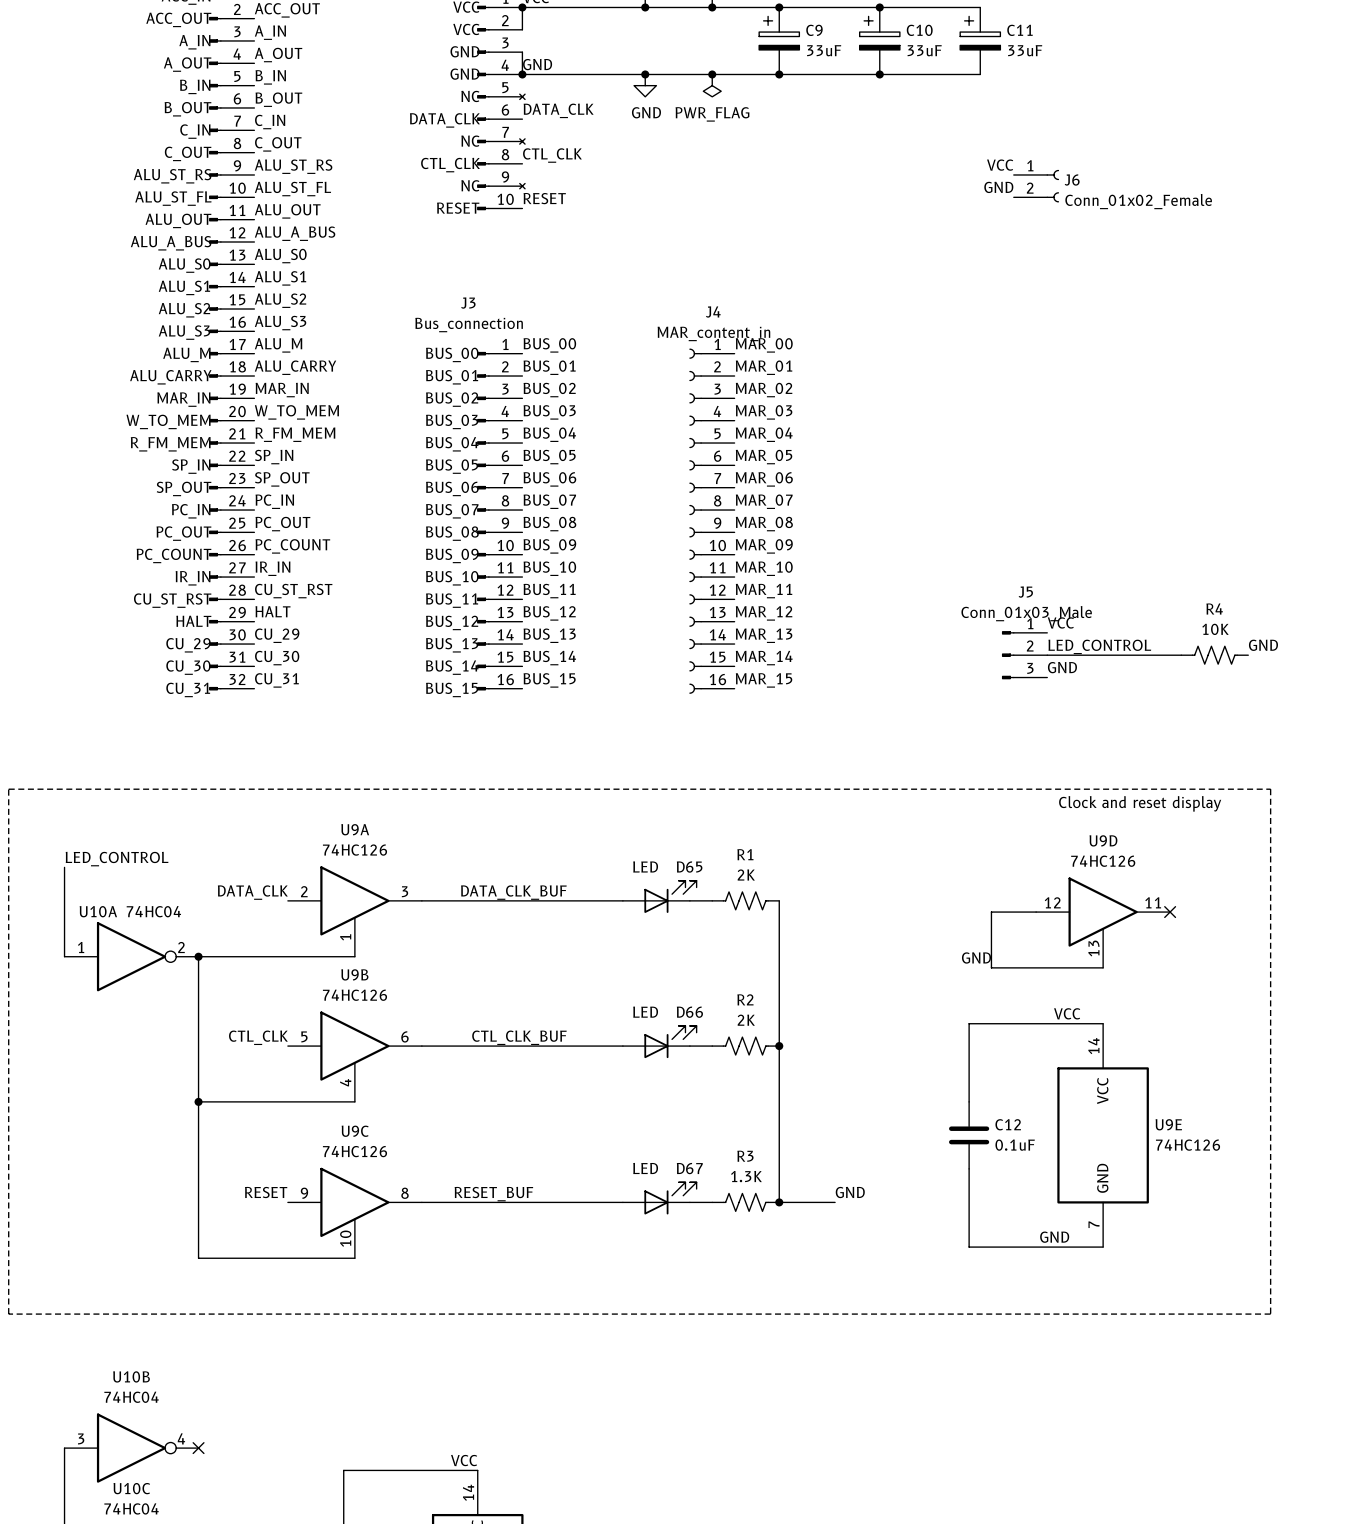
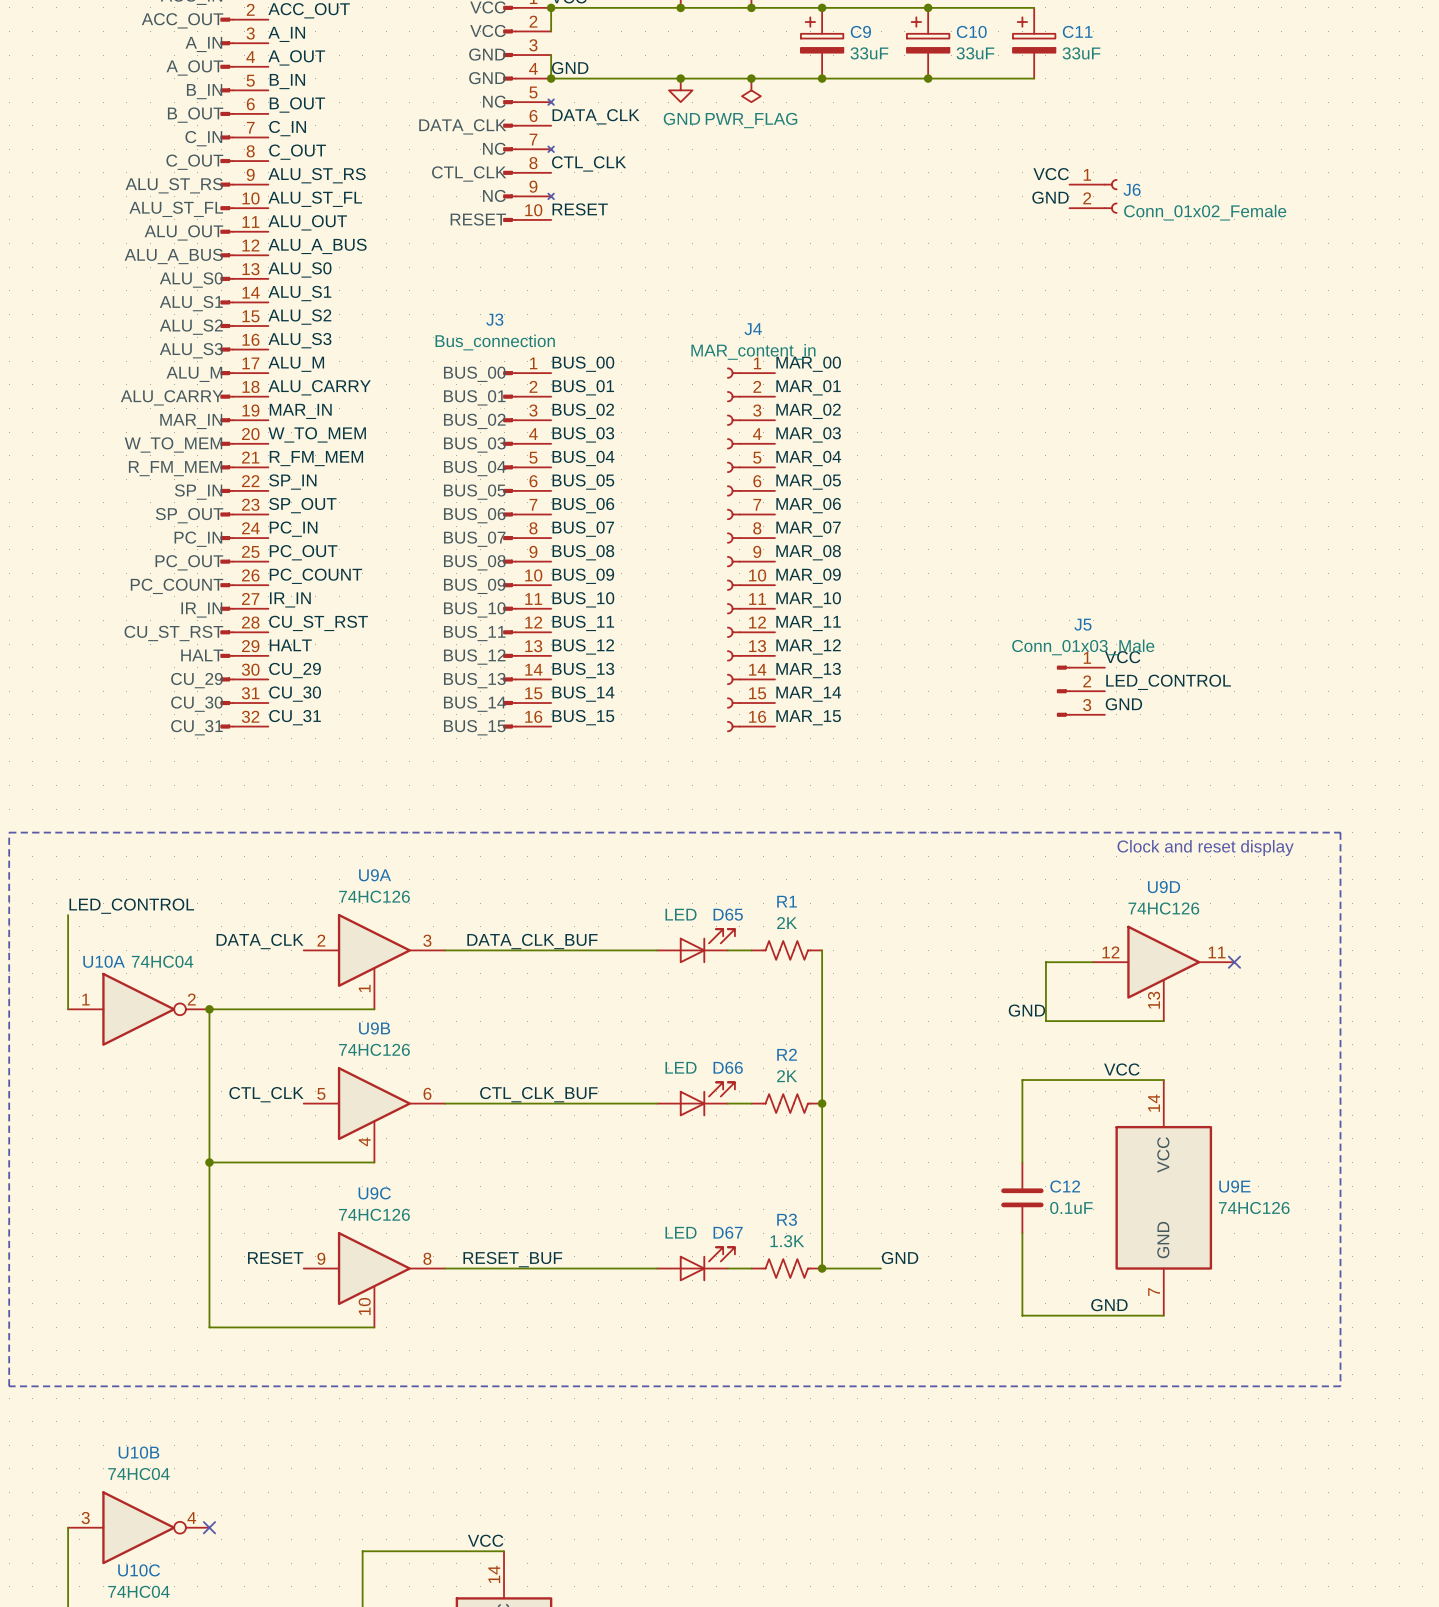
label: GND (1263, 645) -> none
wire: (1047, 655) (1181, 655) -> none
R4: 10K (1214, 655) -> none

